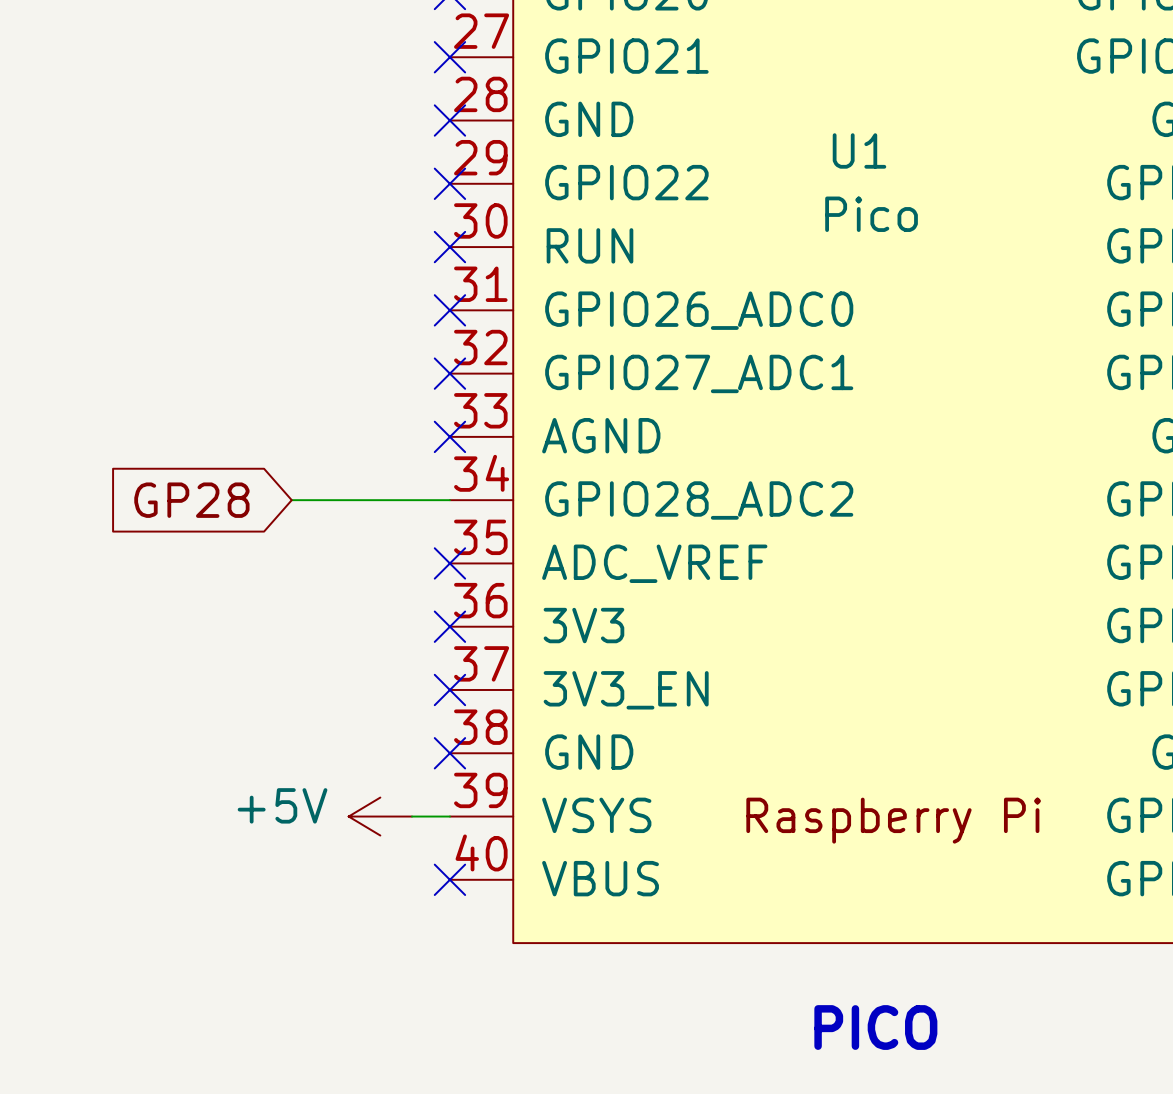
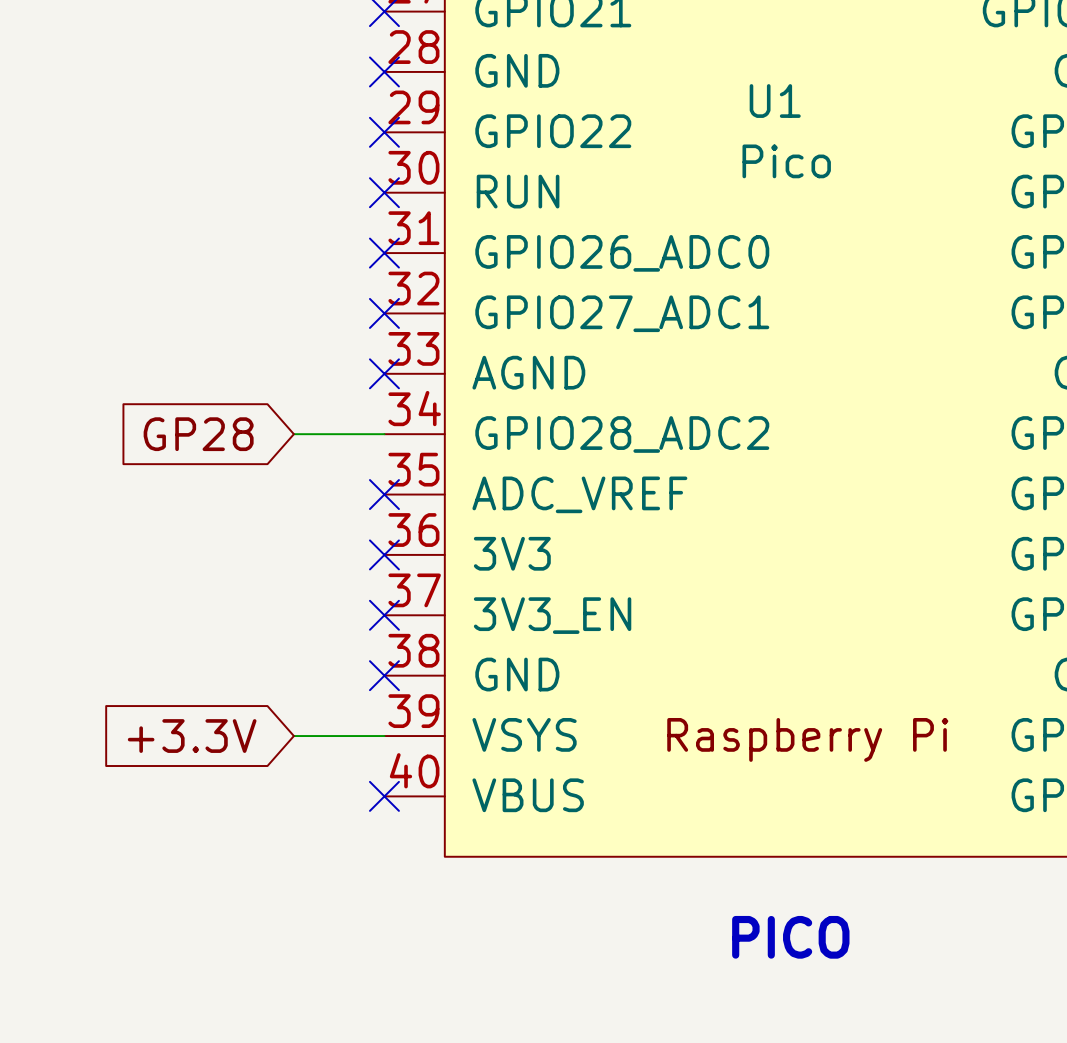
global label position: GP28 (191, 500) -> GP28 (198, 434)
wire: (291, 500) (355, 500) -> none
global label: none -> +3.3V (192, 736)
power symbol: +5V (380, 816) -> none

